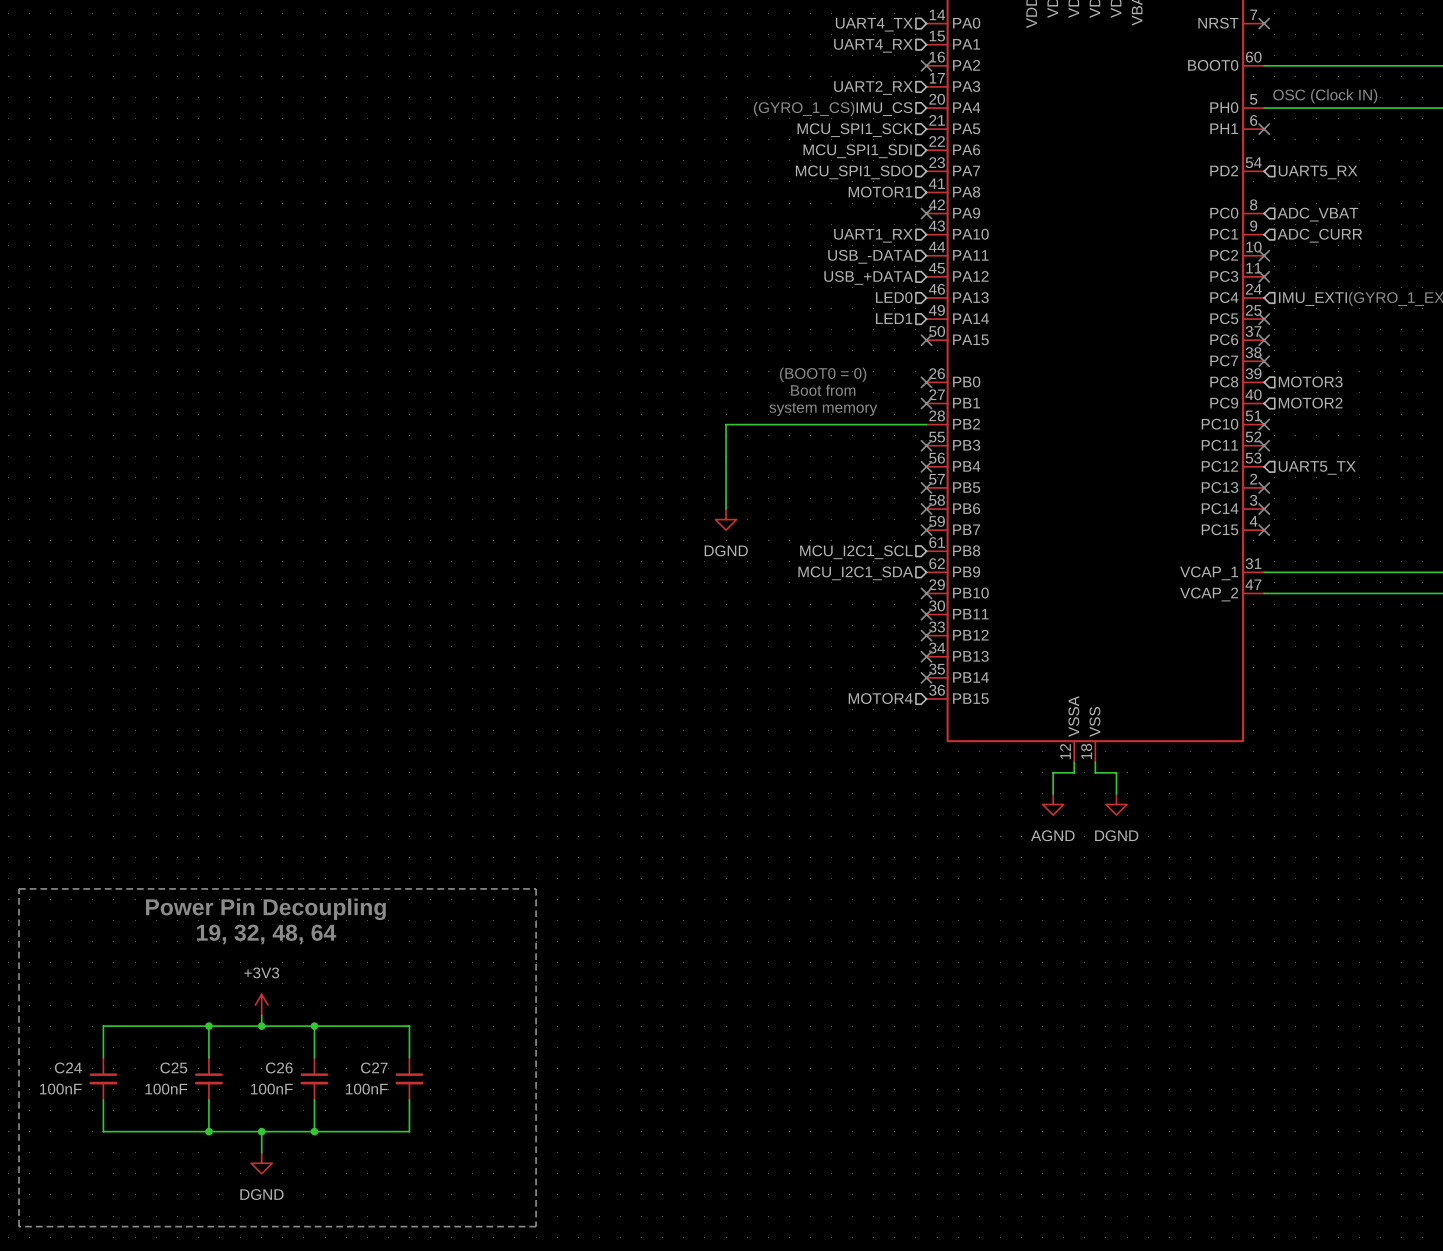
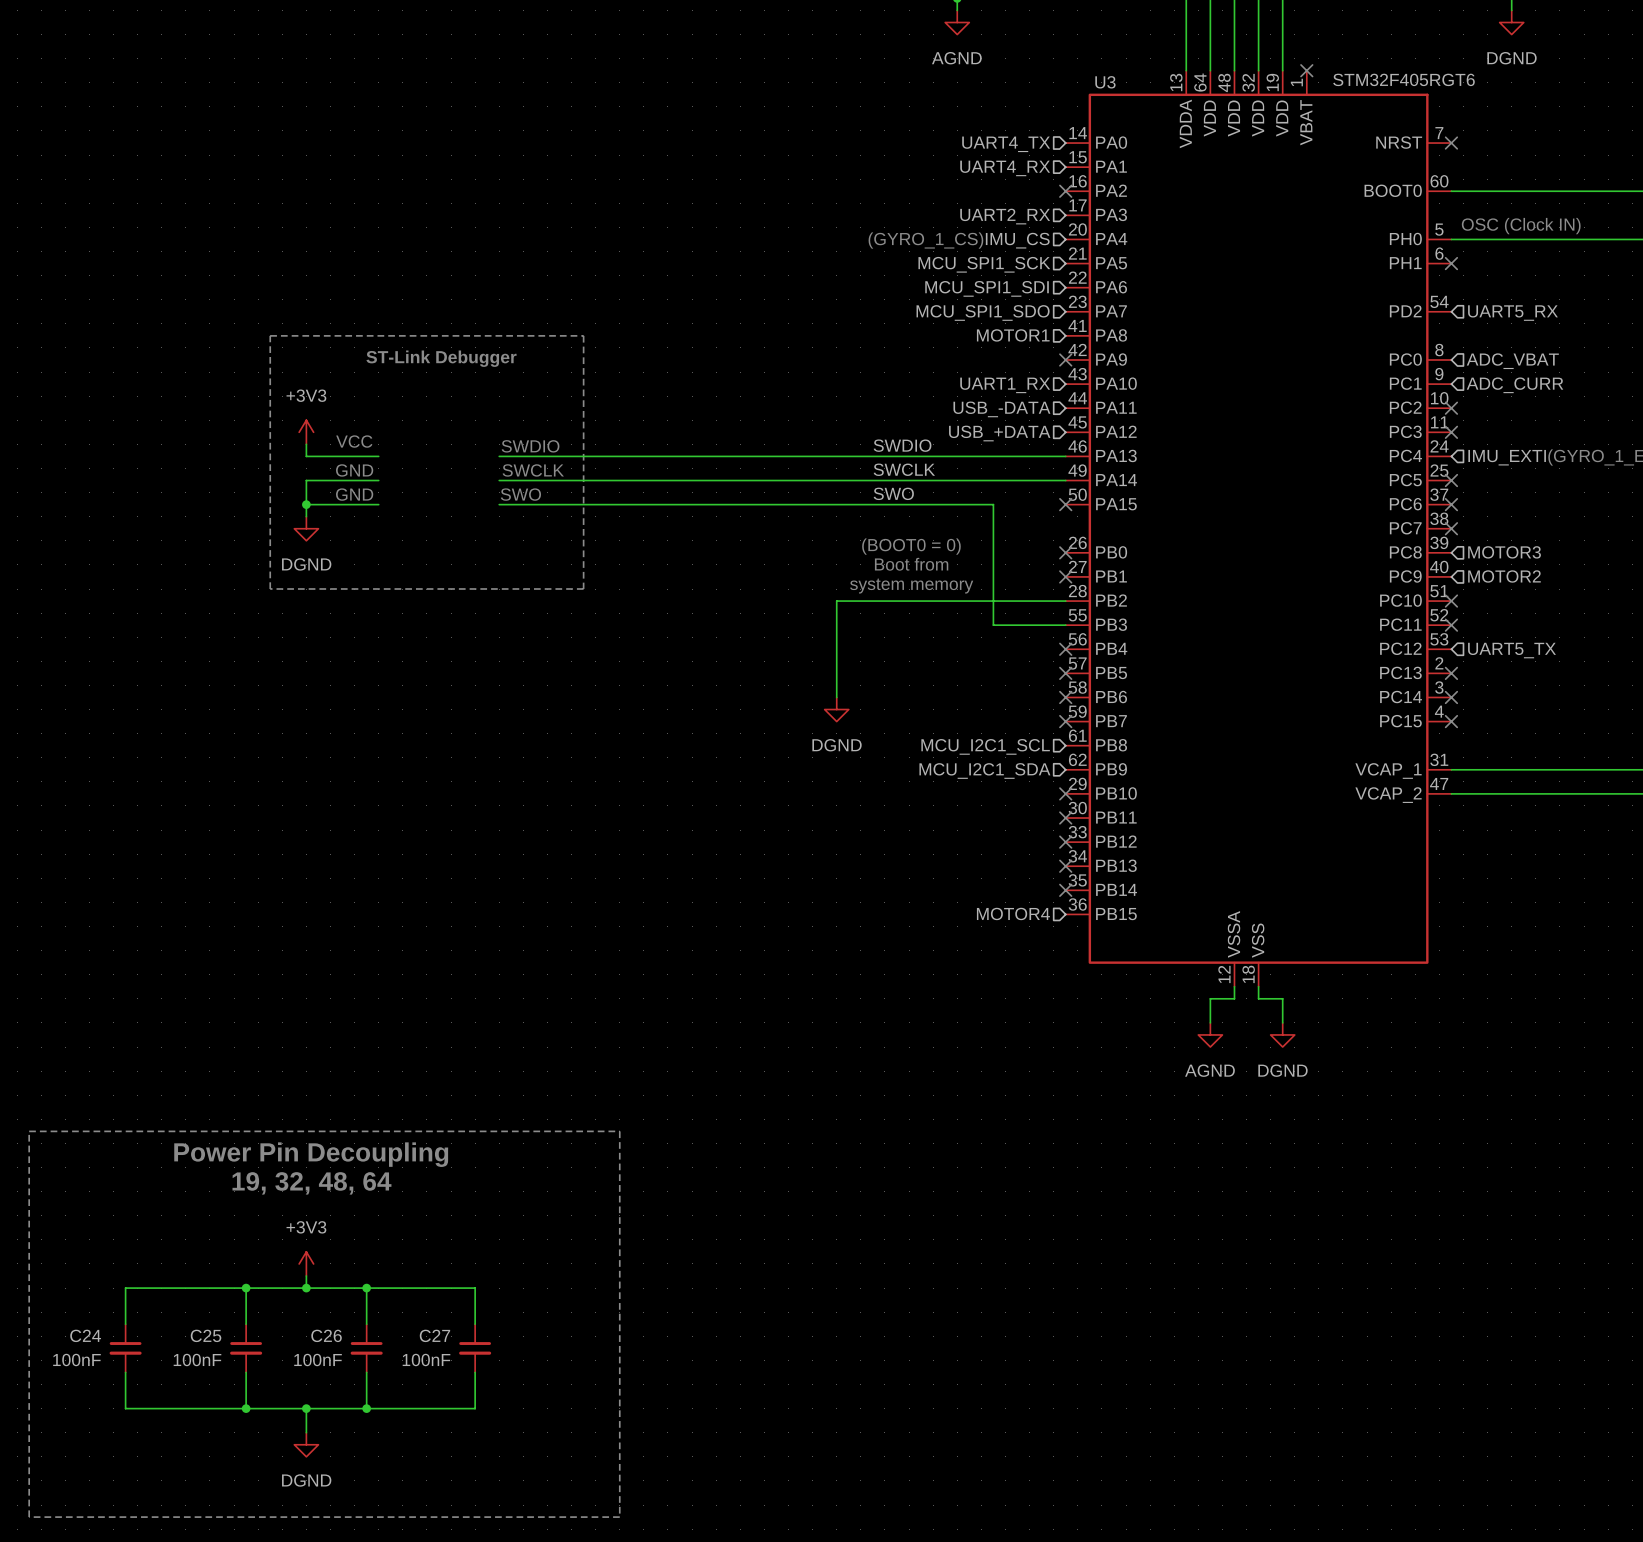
line: none -> (270, 335) (583, 335) (583, 589) (270, 589) (270, 335)
text: none -> ST-Link Debugger (441, 358)
power symbol: none -> +3V3 (306, 432)
text: none -> VCC (354, 441)
wire: none -> (306, 444) (306, 456) (378, 456)
label: none -> SWDIO (902, 445)
text: none -> SWDIO (530, 446)
wire: none -> (499, 456) (1065, 456)
hierarchical label: LED0 (894, 297) -> none
label: none -> SWCLK (904, 469)
text: none -> GND (354, 470)
text: none -> SWCLK (533, 470)
hierarchical label: LED1 (894, 318) -> none
wire: none -> (378, 480) (306, 480) (306, 516)
wire: none -> (499, 480) (1065, 480)
label: none -> SWO (893, 493)
text: none -> GND (354, 494)
text: none -> SWO (520, 494)
wire: none -> (306, 504) (378, 504)
junction: none -> (306, 504)
wire: none -> (499, 504) (993, 504) (993, 625) (1065, 625)
power symbol: none -> DGND (306, 528)
text position: (BOOT0 = 0) (823, 374) -> (BOOT0 = 0) (911, 546)
text position: Boot from (823, 390) -> Boot from (911, 564)
text position: system memory (823, 409) -> system memory (911, 586)
no-connect mark: (926, 445) -> none

